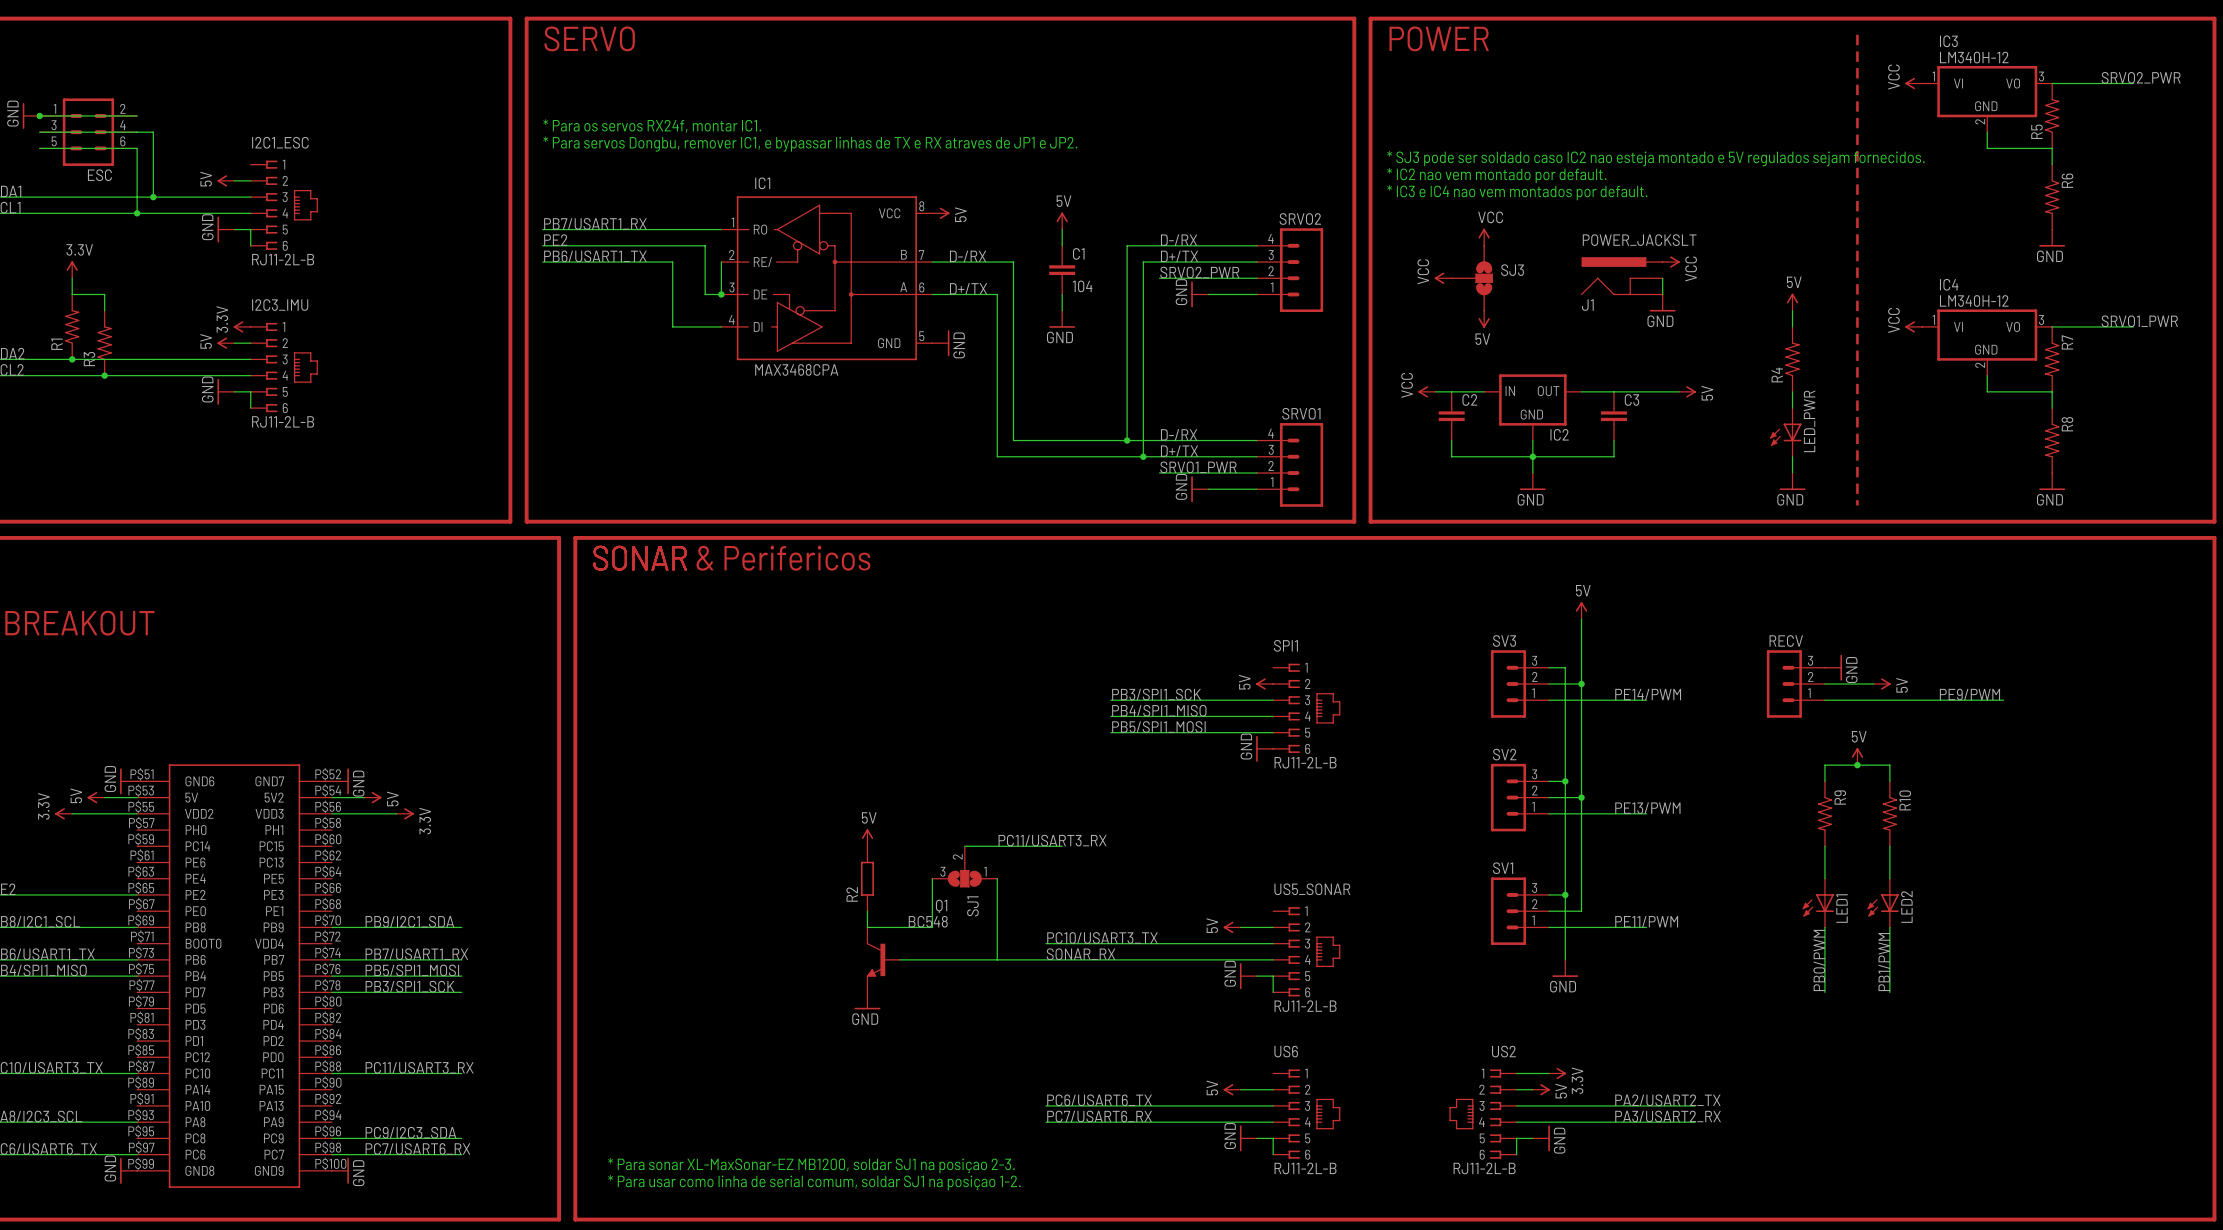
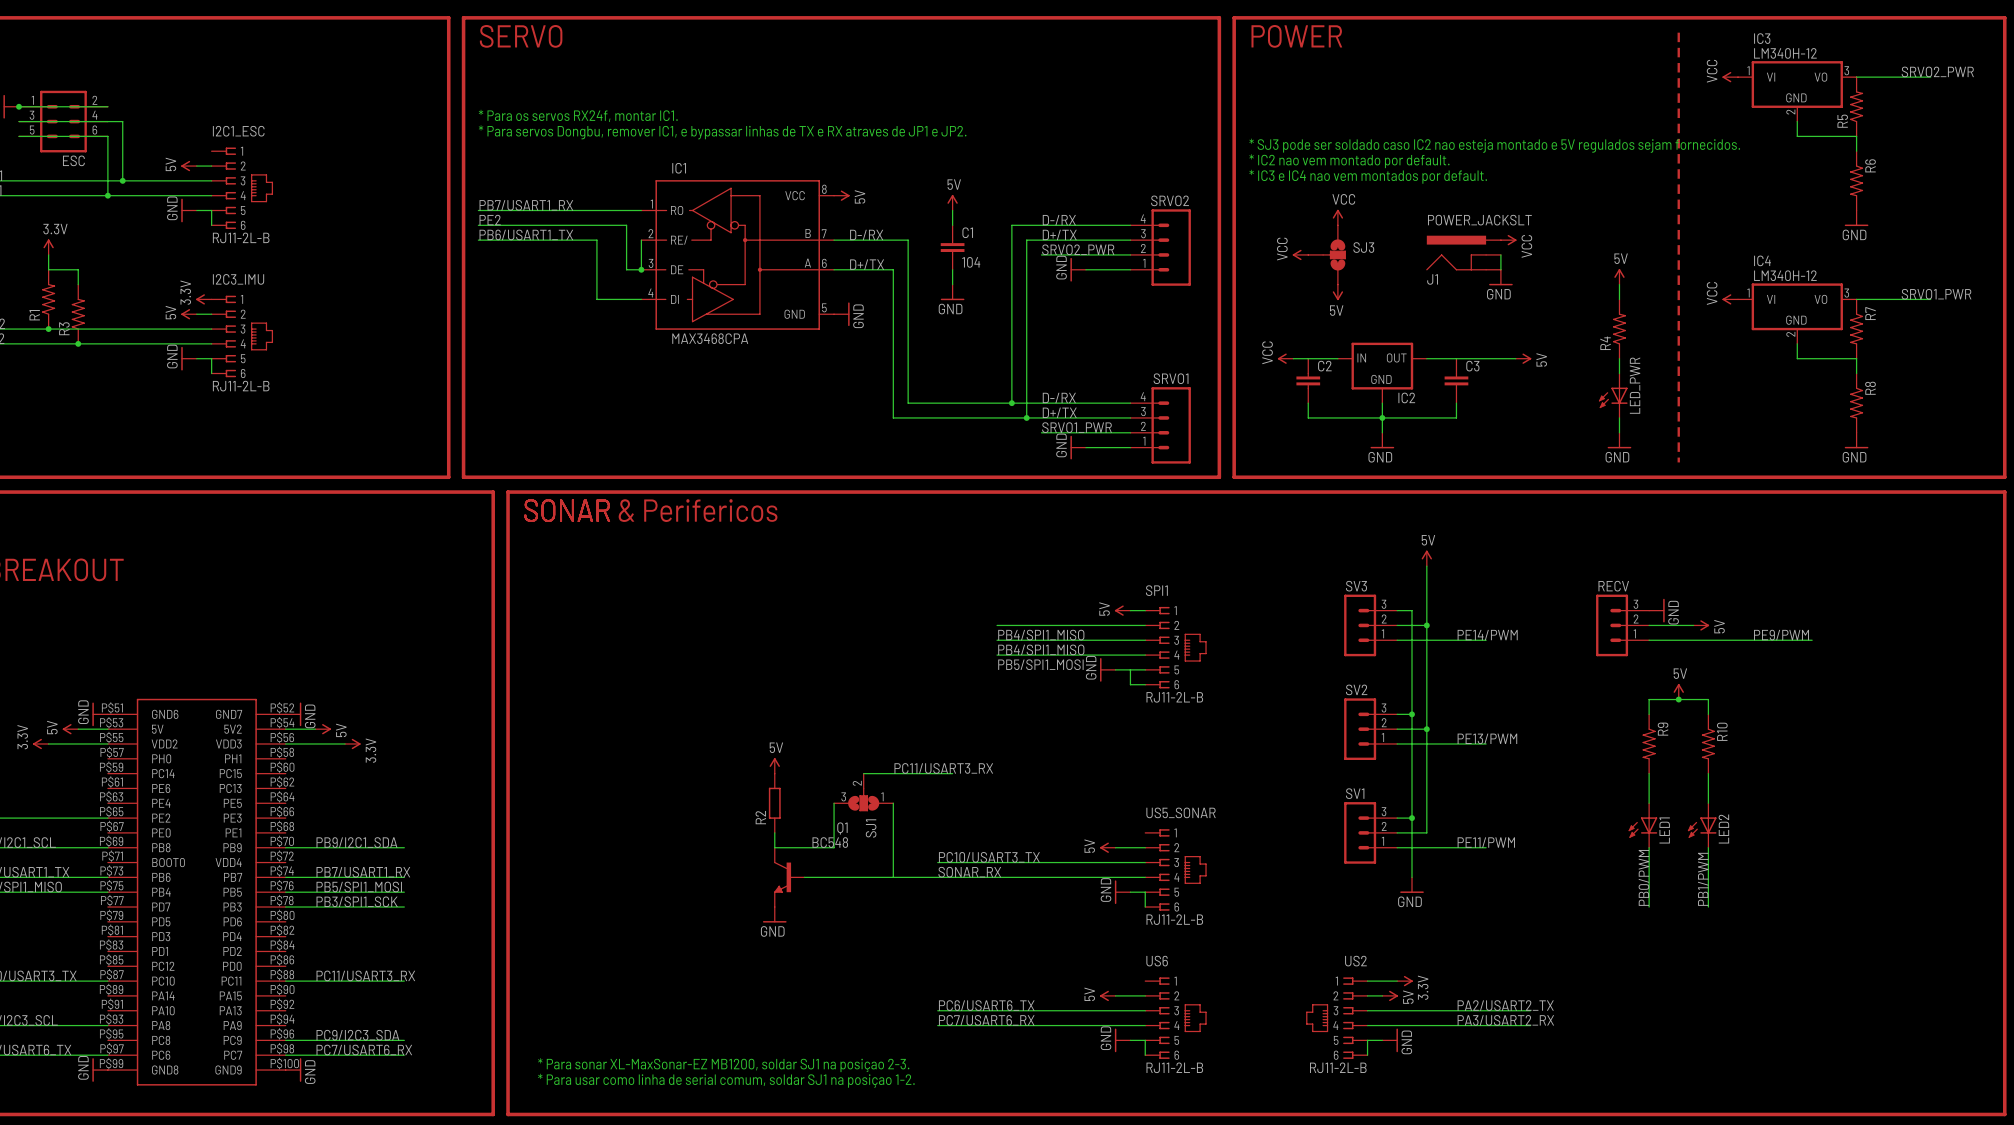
wire: none -> (1130, 610) (1145, 610)
wire: none -> (997, 625) (1145, 625)
power symbol position: 5V (1264, 683) -> 5V (1122, 610)
label: PB3/SPI1_SCK (1156, 694) -> PB4/SPI1_MISO (1041, 635)
wire: (1110, 732) (1240, 732) -> none
power symbol position: GND (1264, 748) -> GND (1107, 669)

